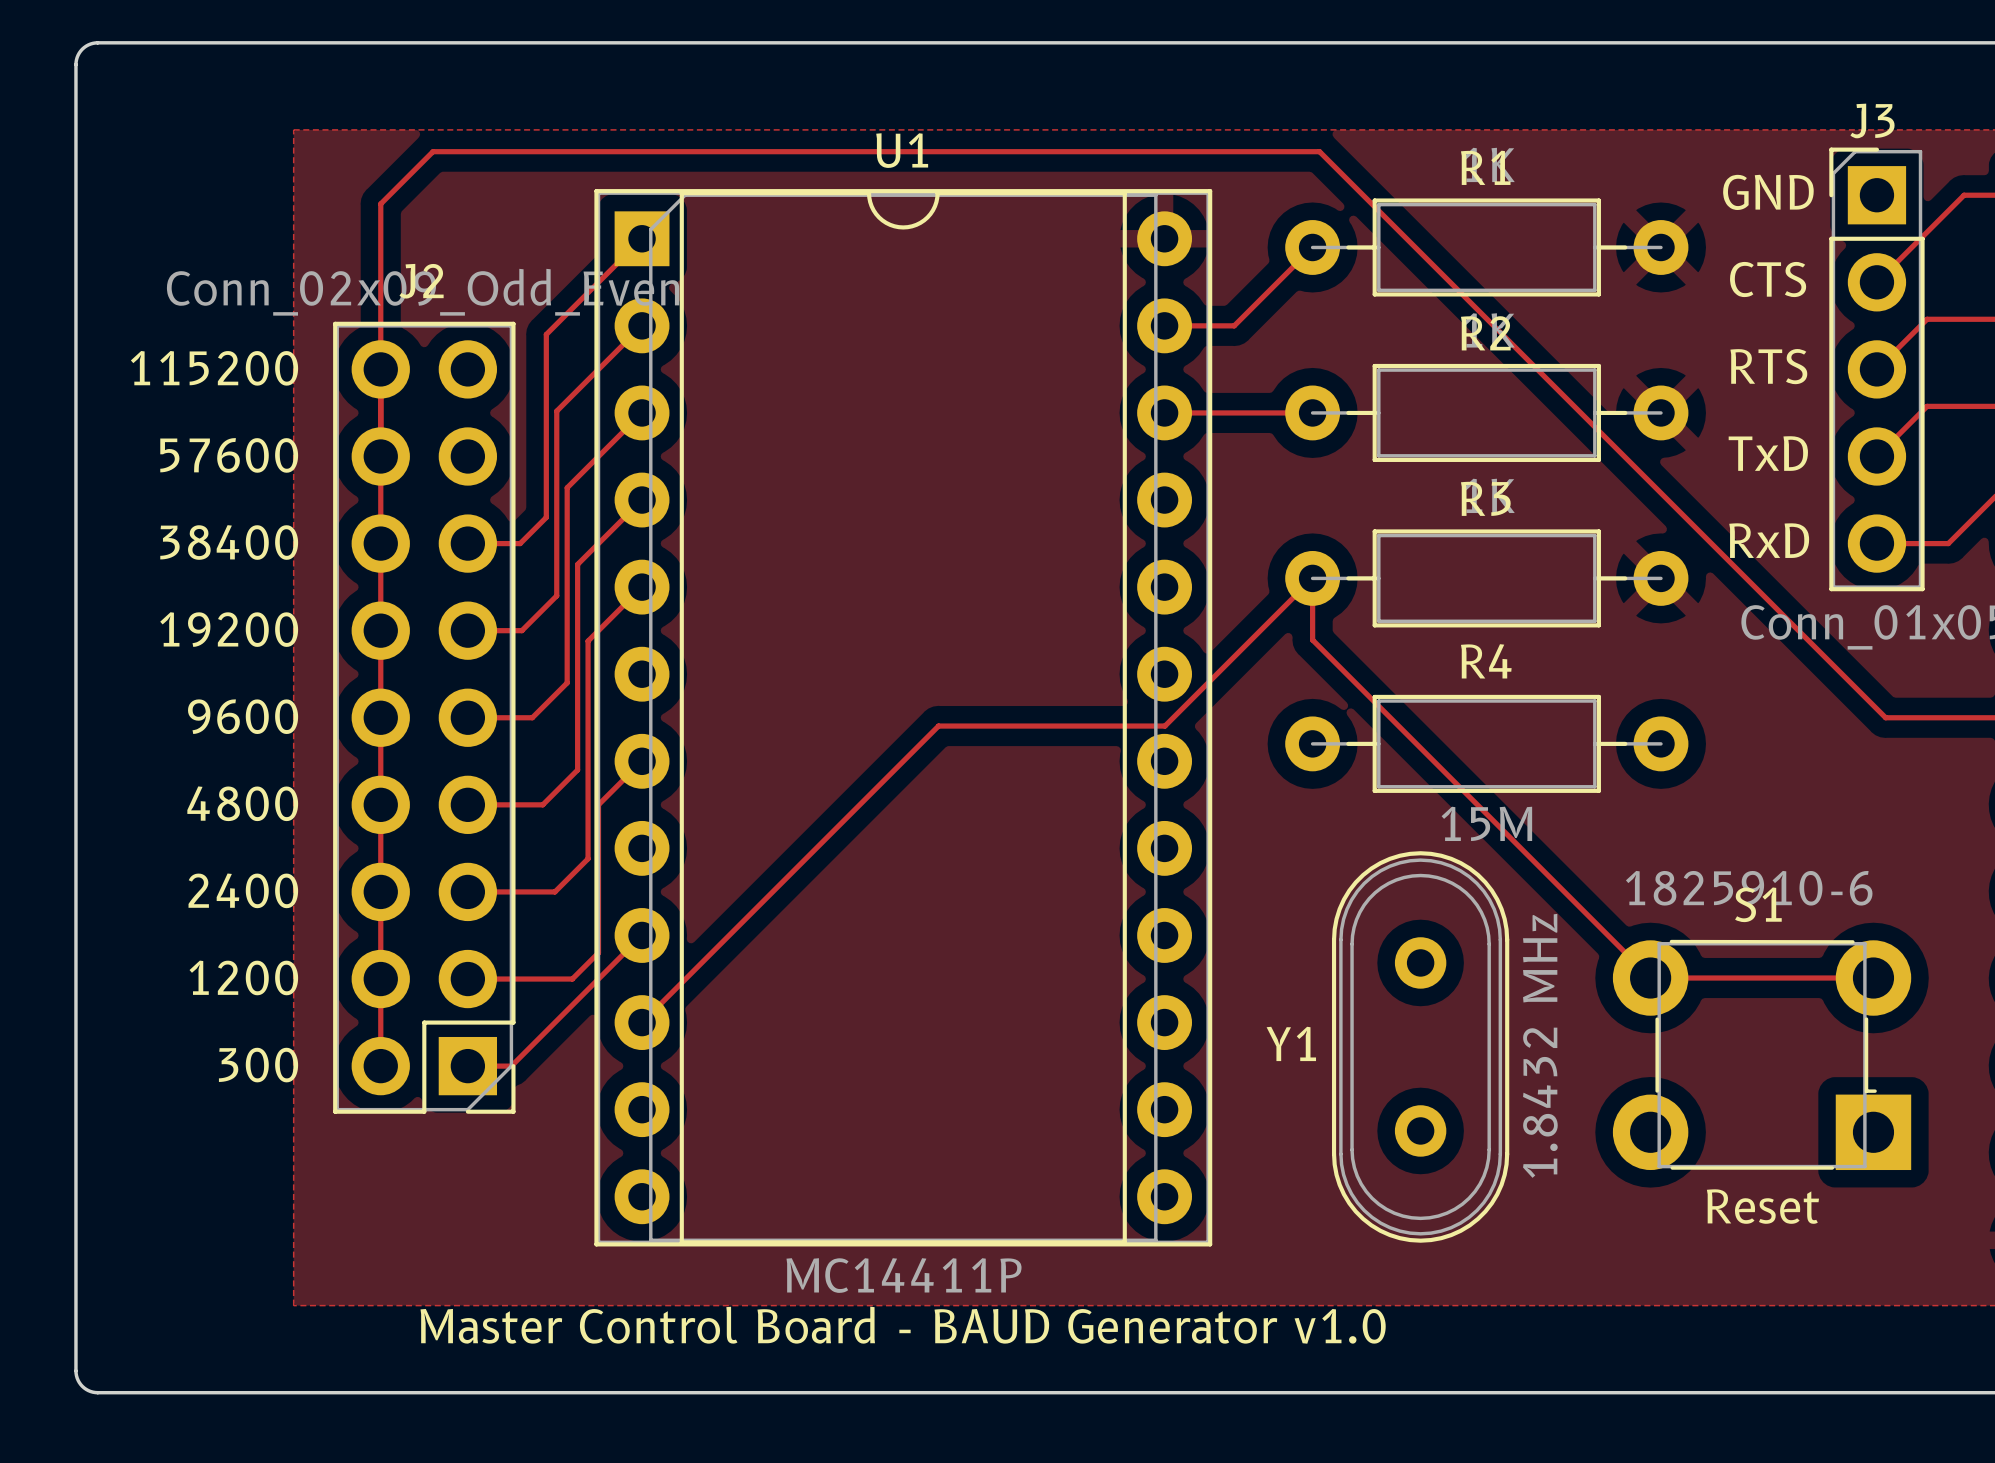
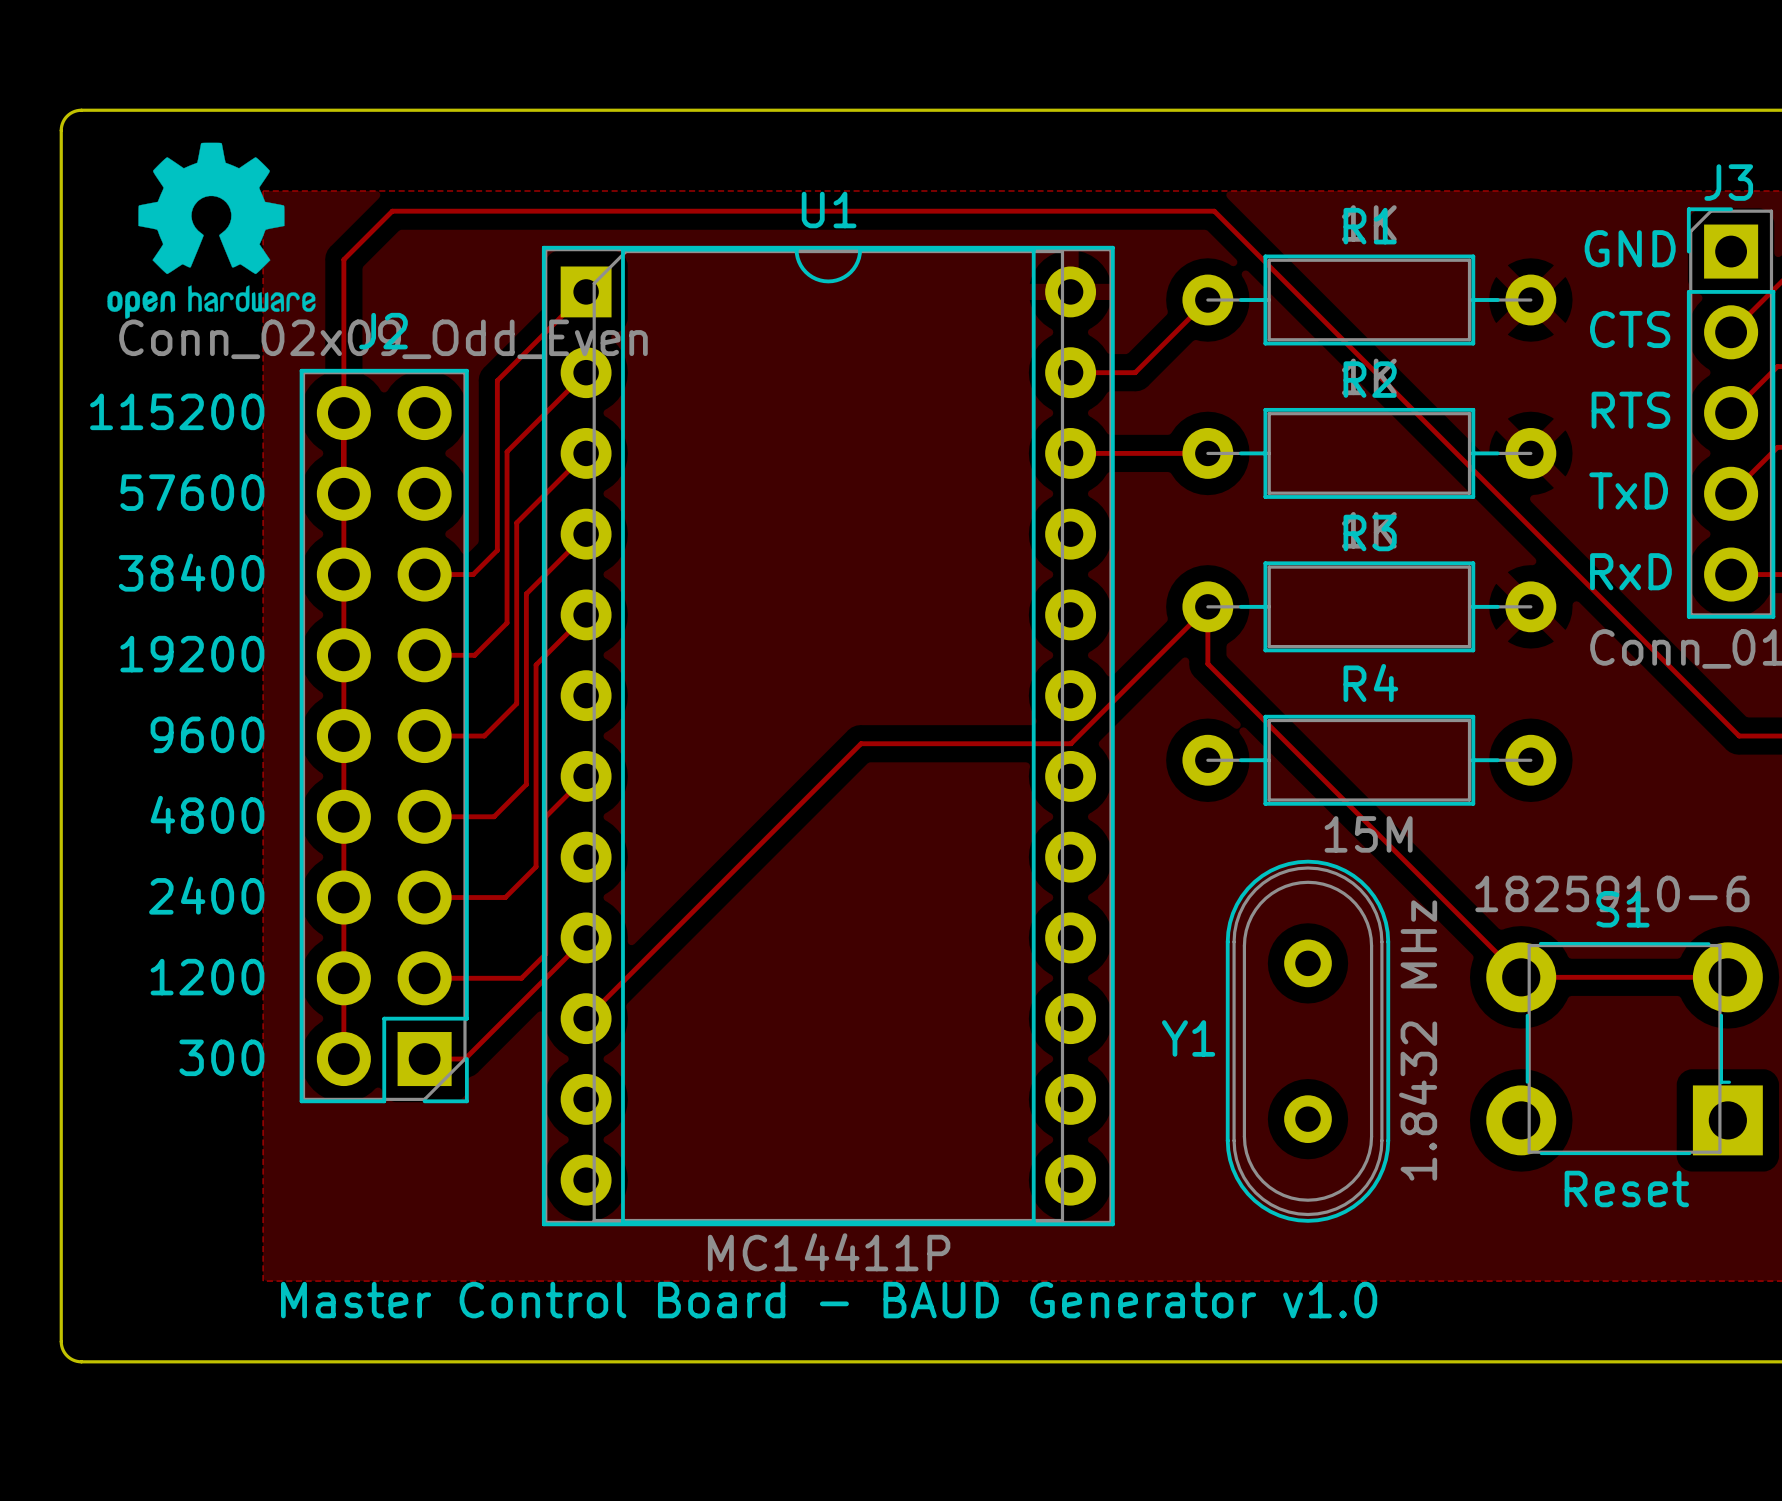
drawing: none -> [107, 142, 316, 319]

